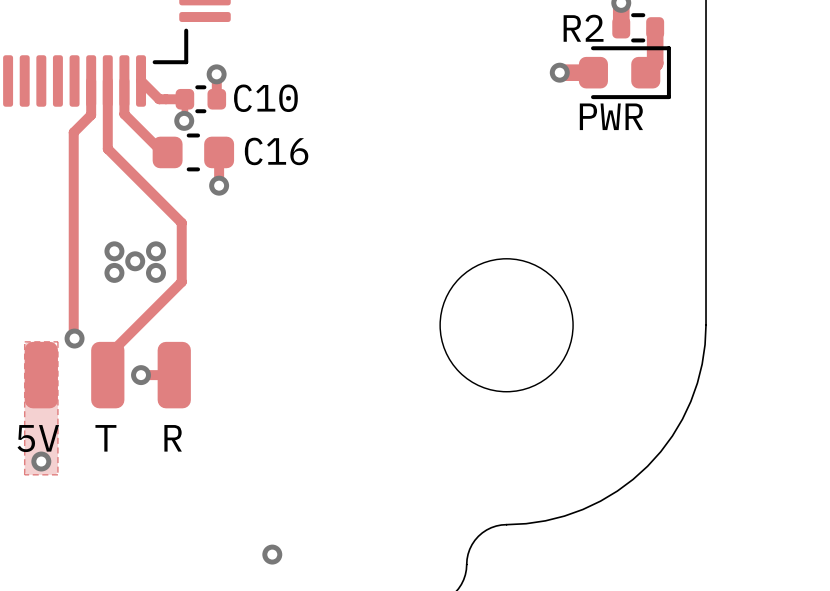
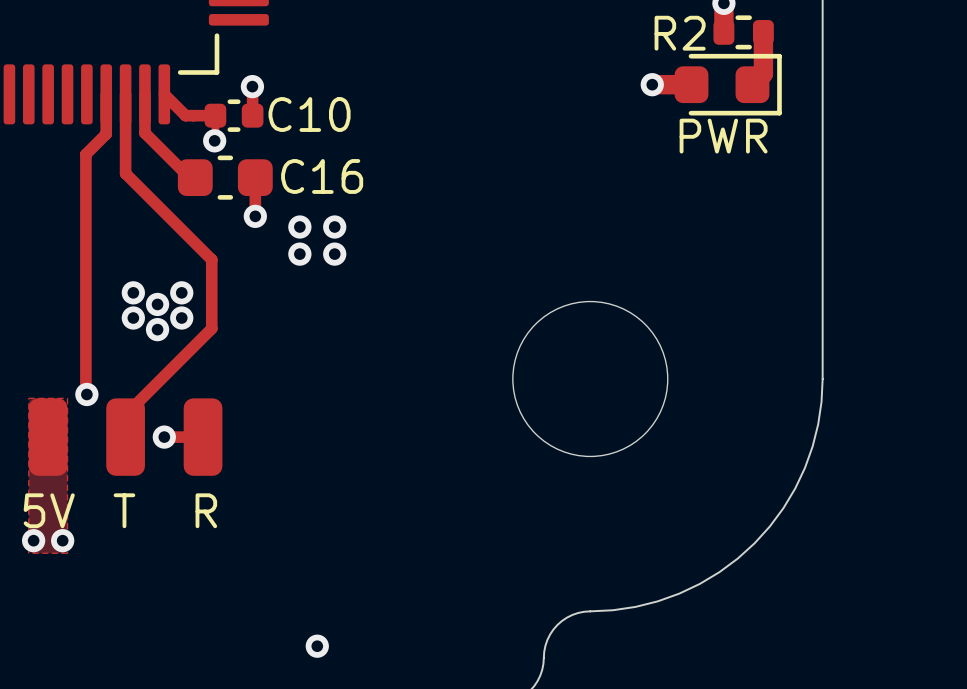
via: none -> (299, 227)
via: none -> (334, 227)
via: none -> (299, 254)
via: none -> (334, 254)
via: none -> (157, 329)
via: (41, 461) -> none
via: none -> (33, 540)
via: none -> (62, 540)

